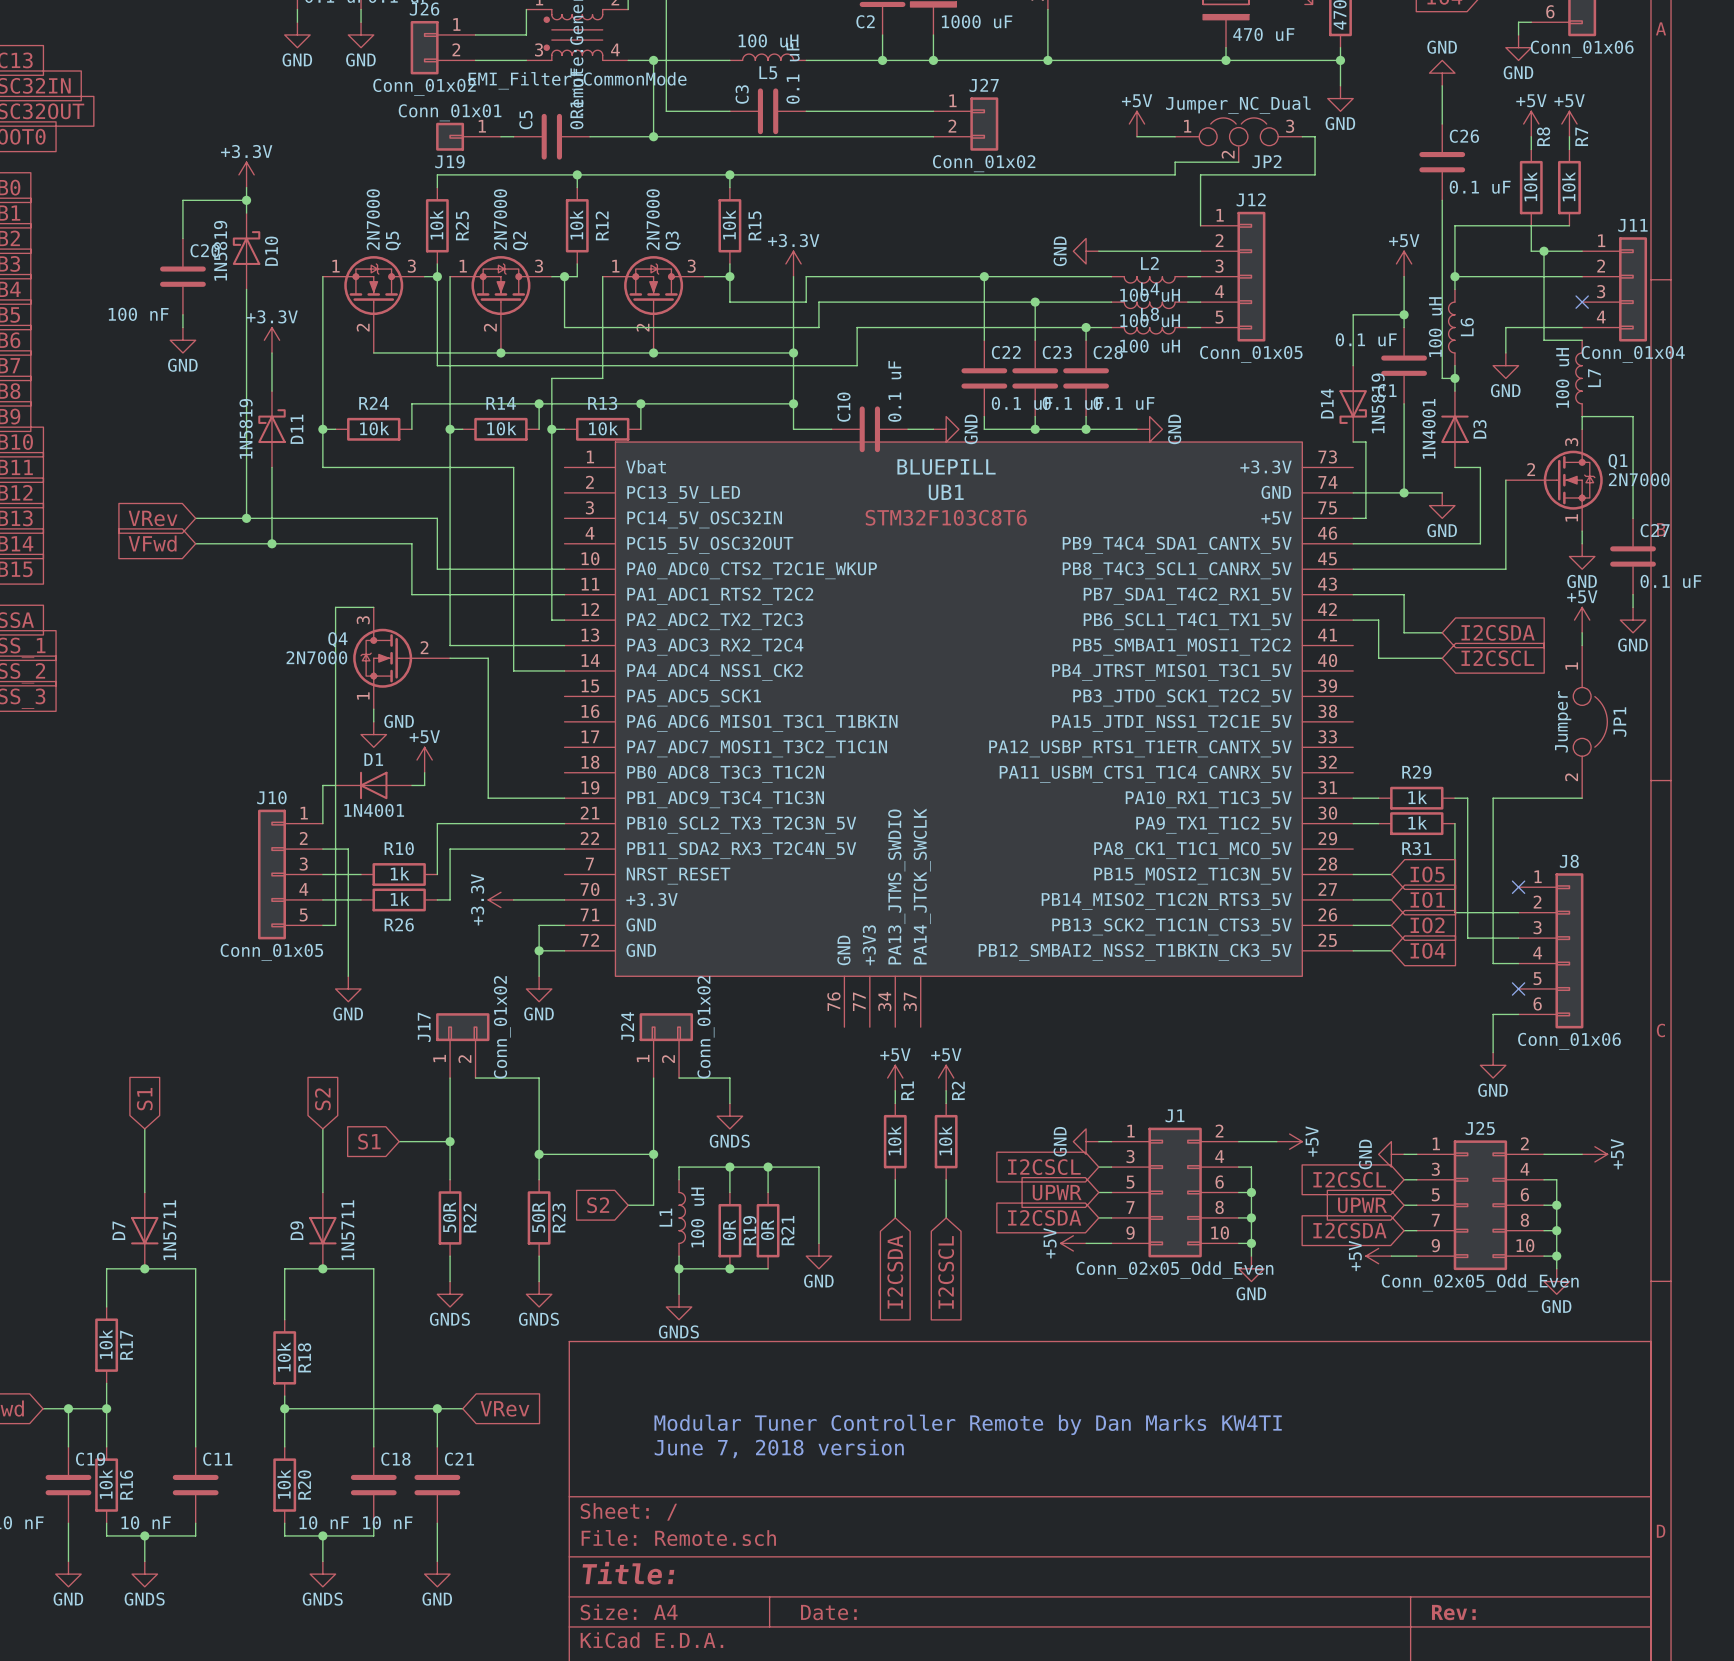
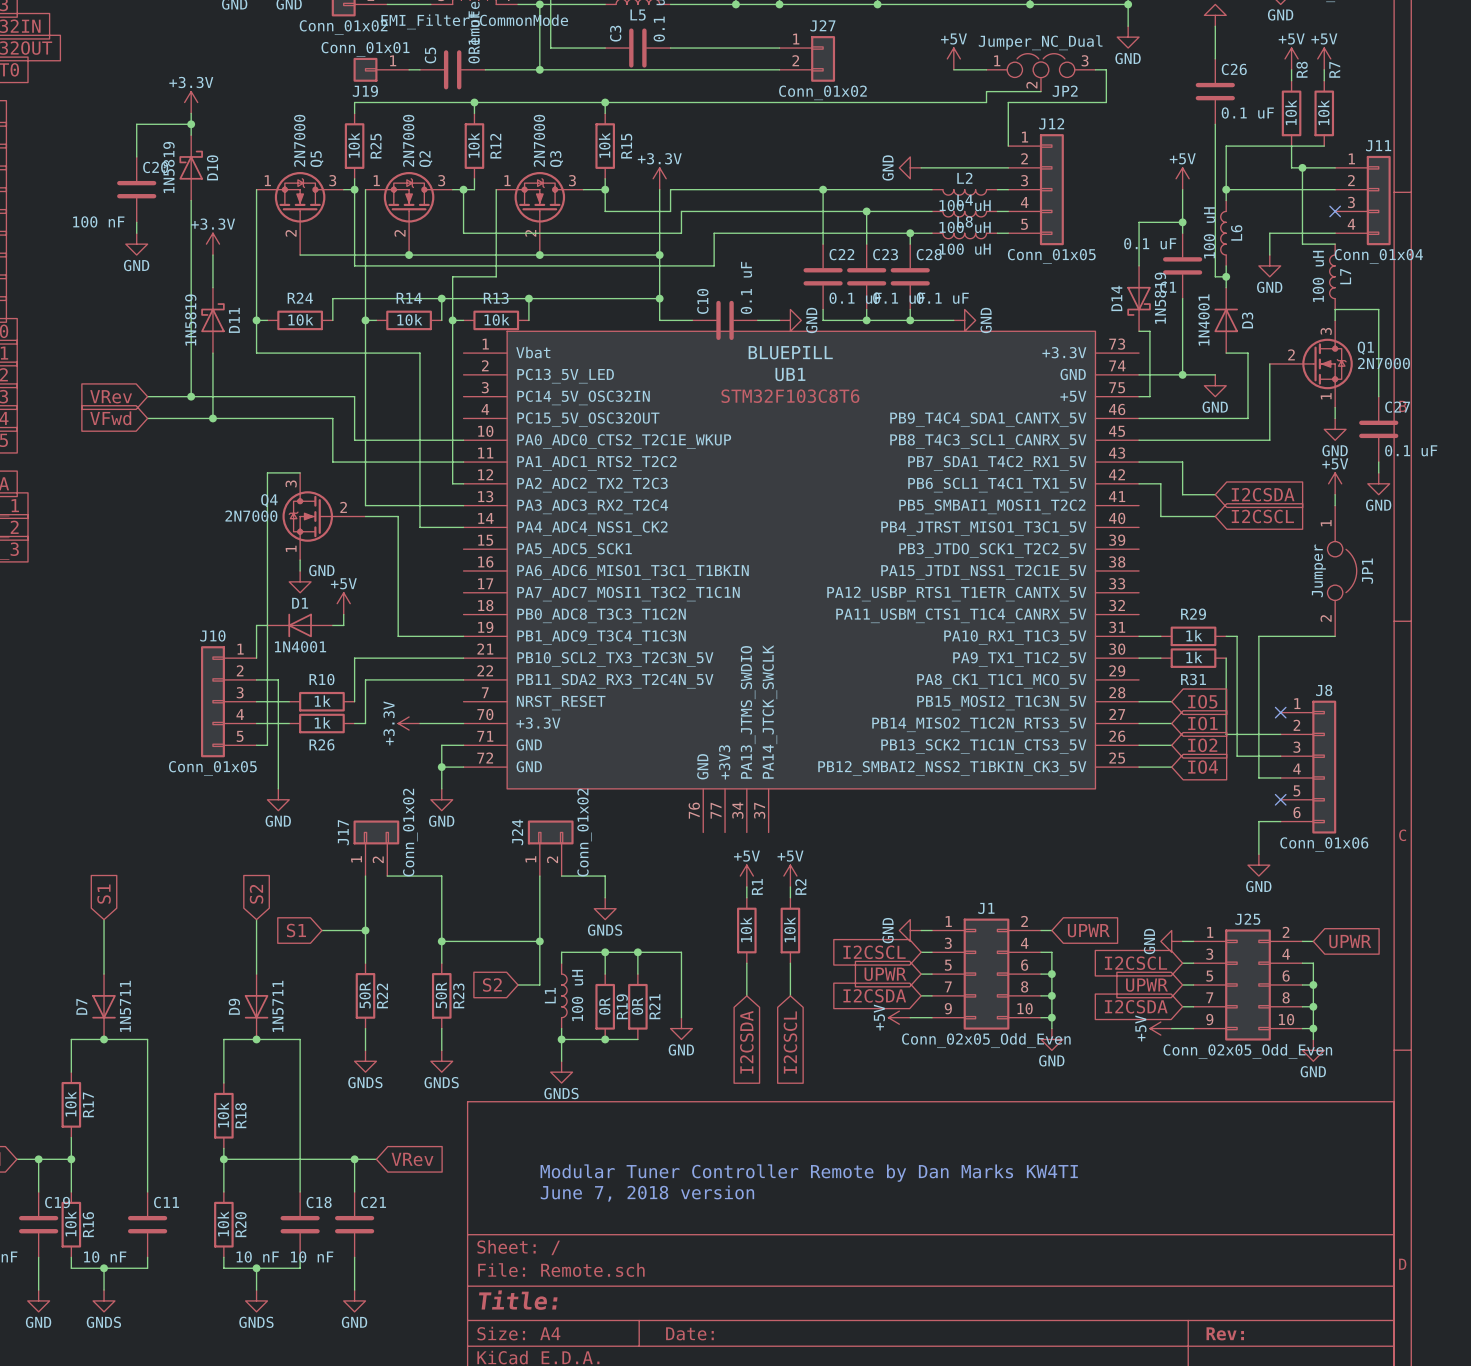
wire: (1251, 1141) (1276, 1141) -> none
power symbol: +5V (1289, 1141) -> none
global label: none -> UPWR (1088, 930)
wire: (1556, 1154) (1582, 1154) -> none
power symbol: +5V (1594, 1154) -> none
global label: none -> UPWR (1350, 941)

